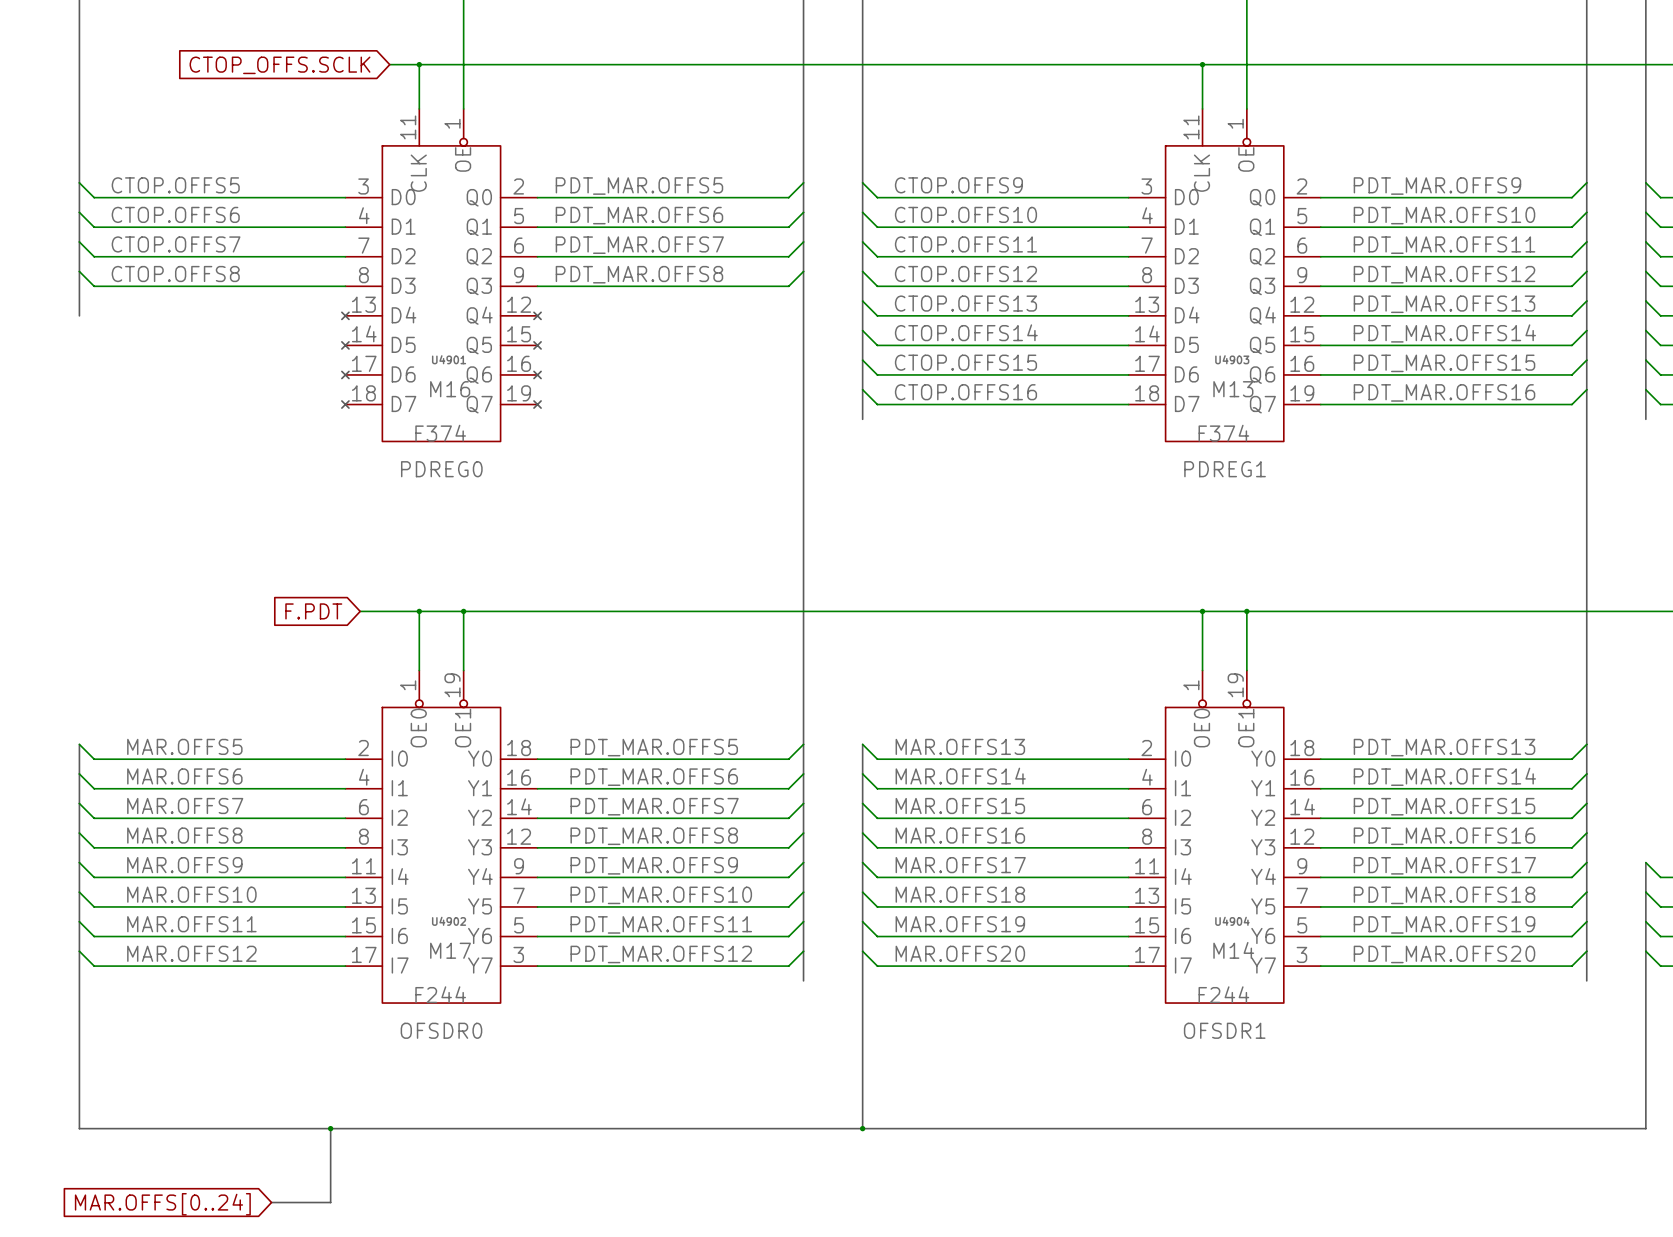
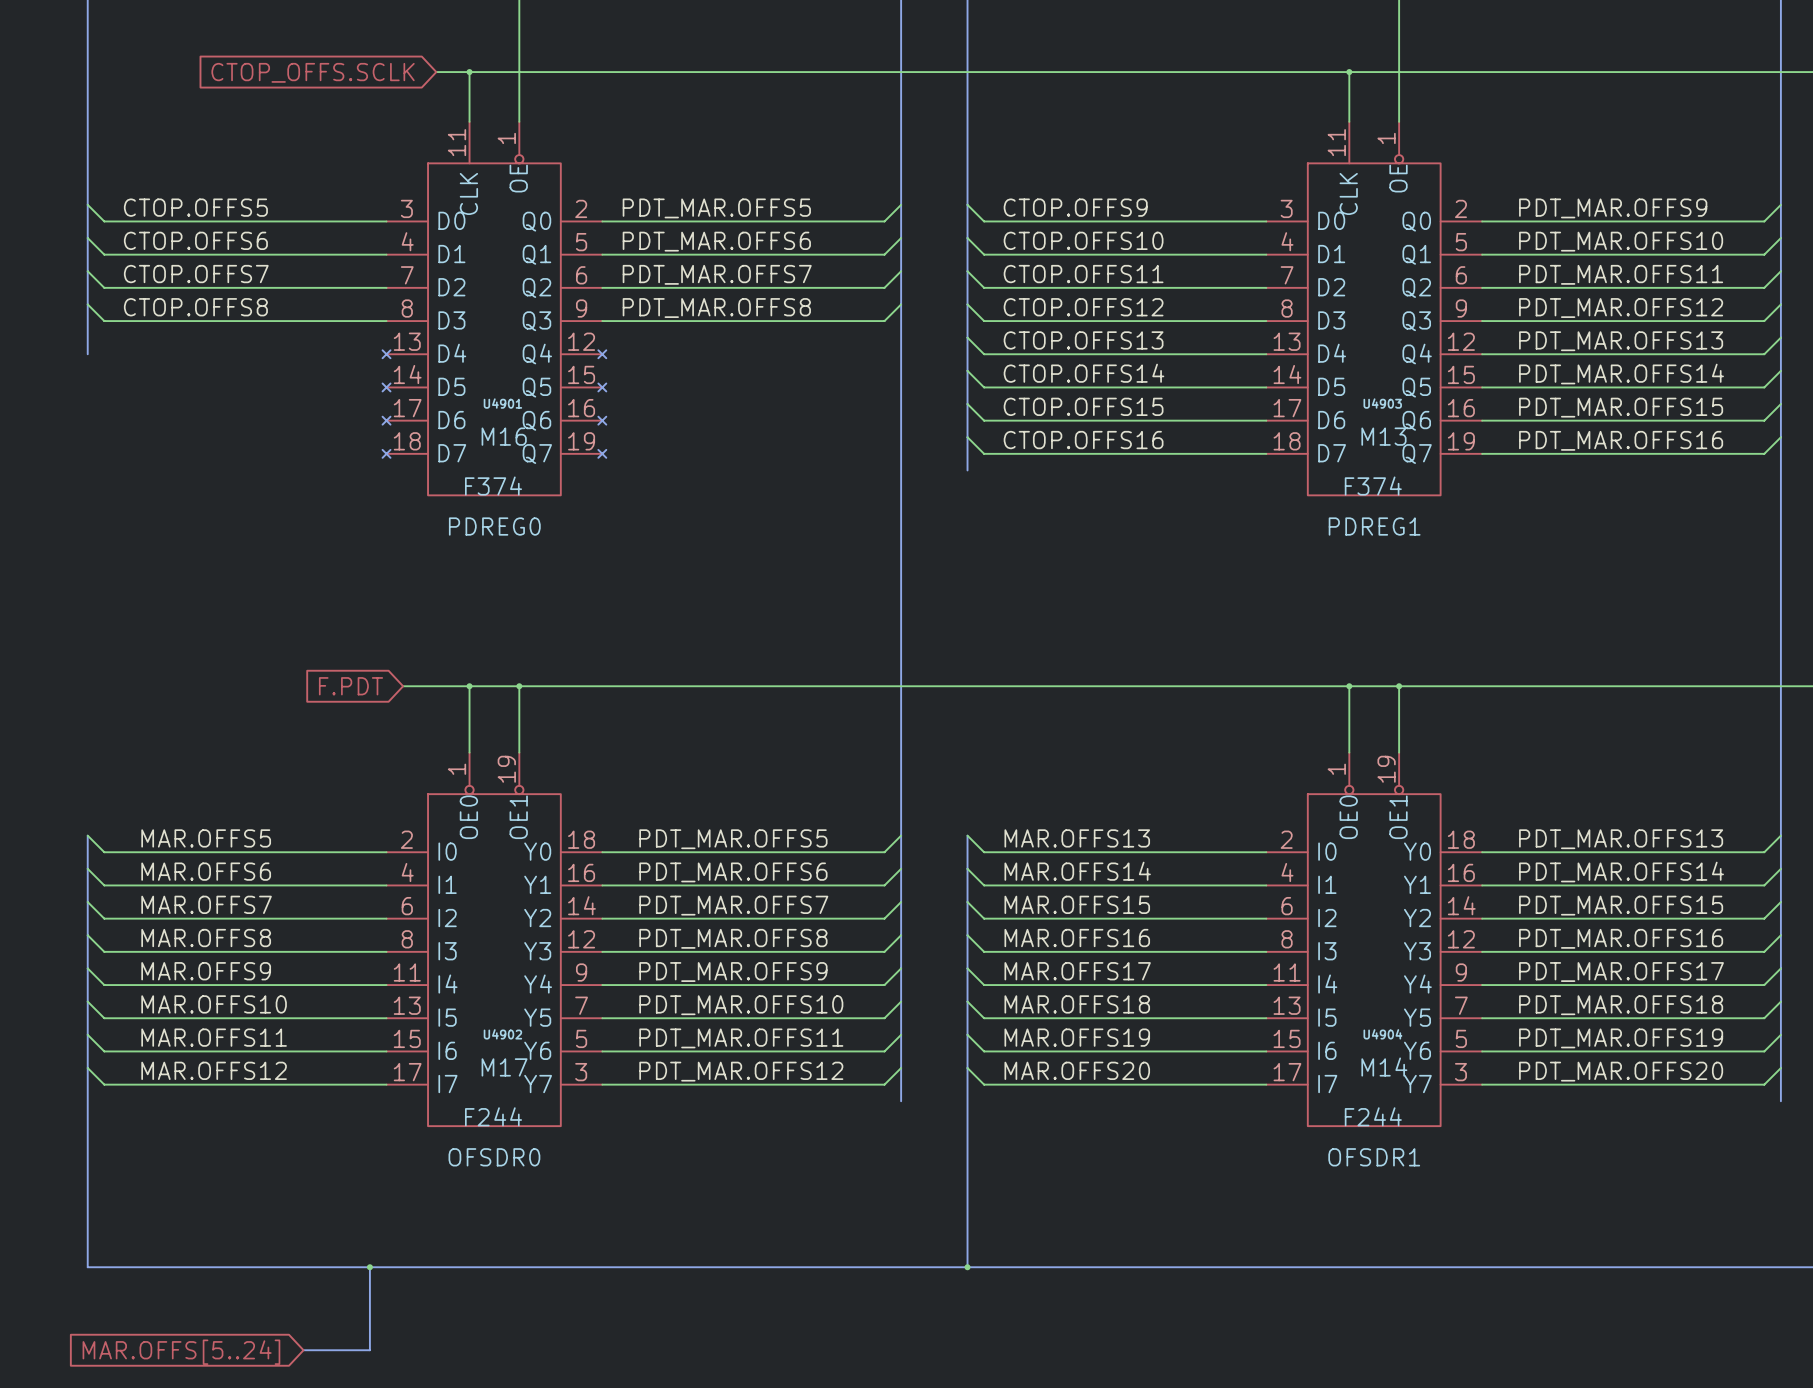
global label: MAR.OFFS[0..24] (162, 1204) -> MAR.OFFS[5..24] (181, 1352)

